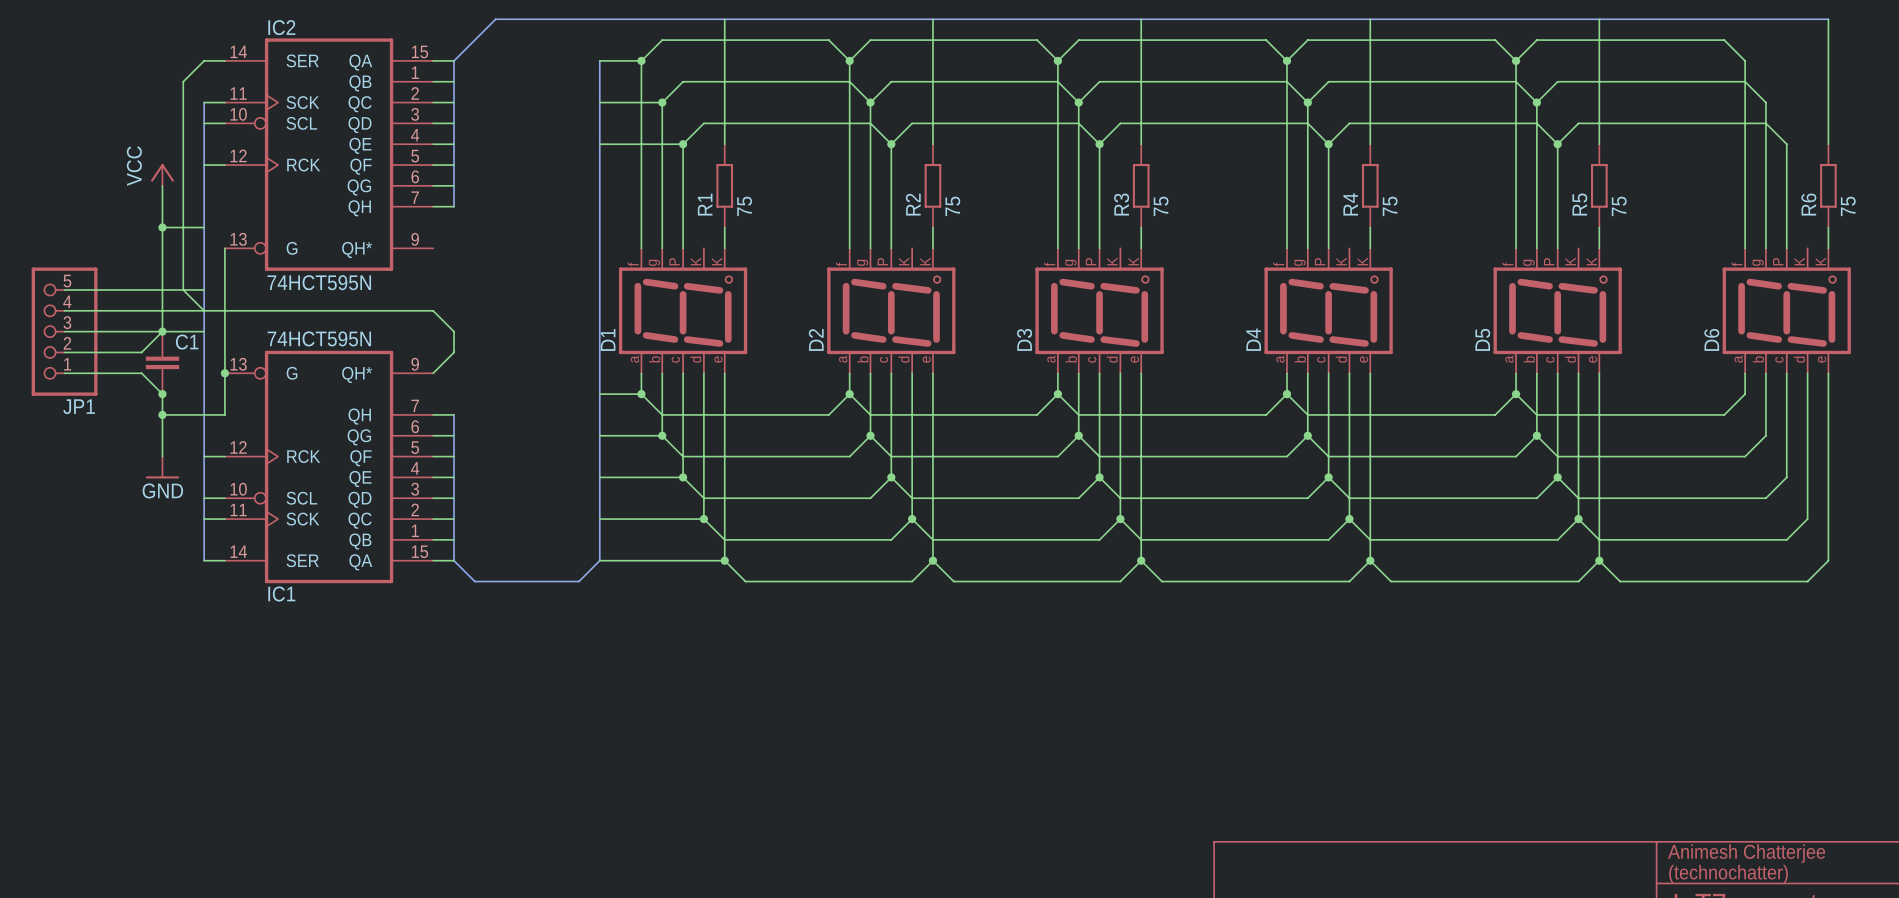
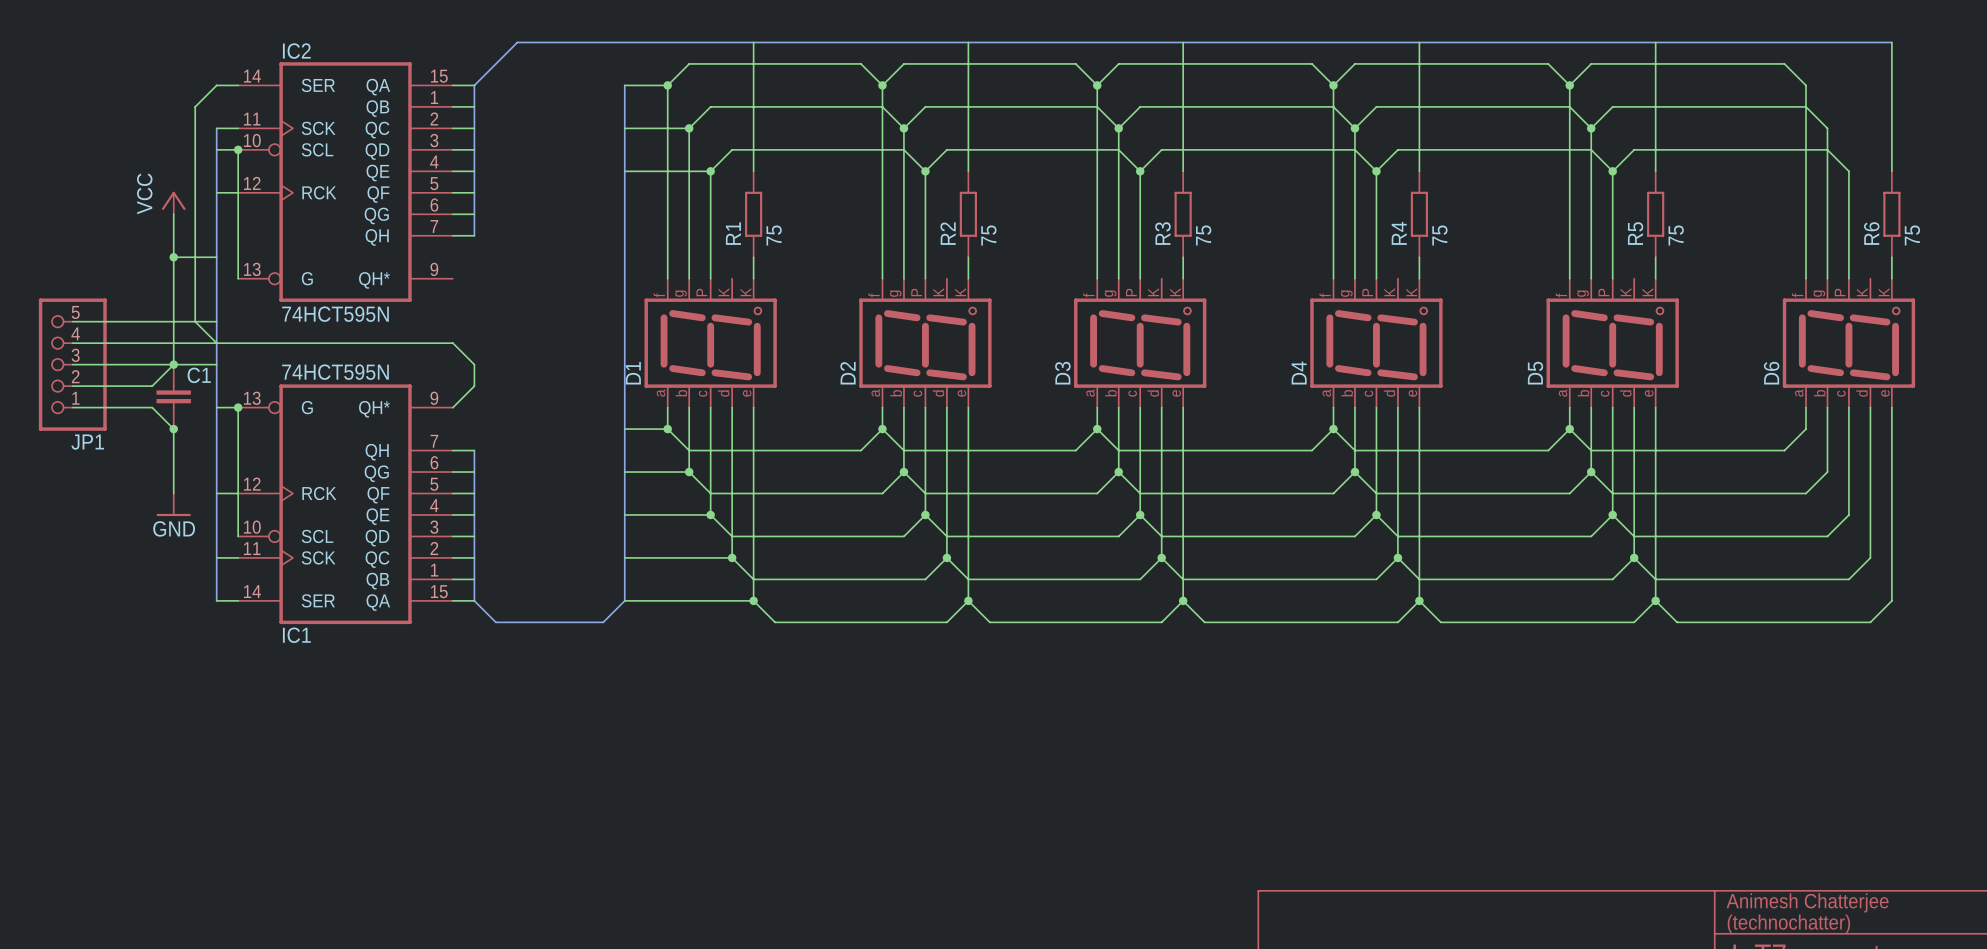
wire: none -> (238, 149) (238, 278)
junction: none -> (238, 149)
wire: (224, 248) (224, 373) -> (216, 407) (238, 407)
wire: (162, 414) (224, 414) -> none
junction: (162, 414) -> none
wire: (204, 498) (224, 498) -> (238, 450) (238, 536)

